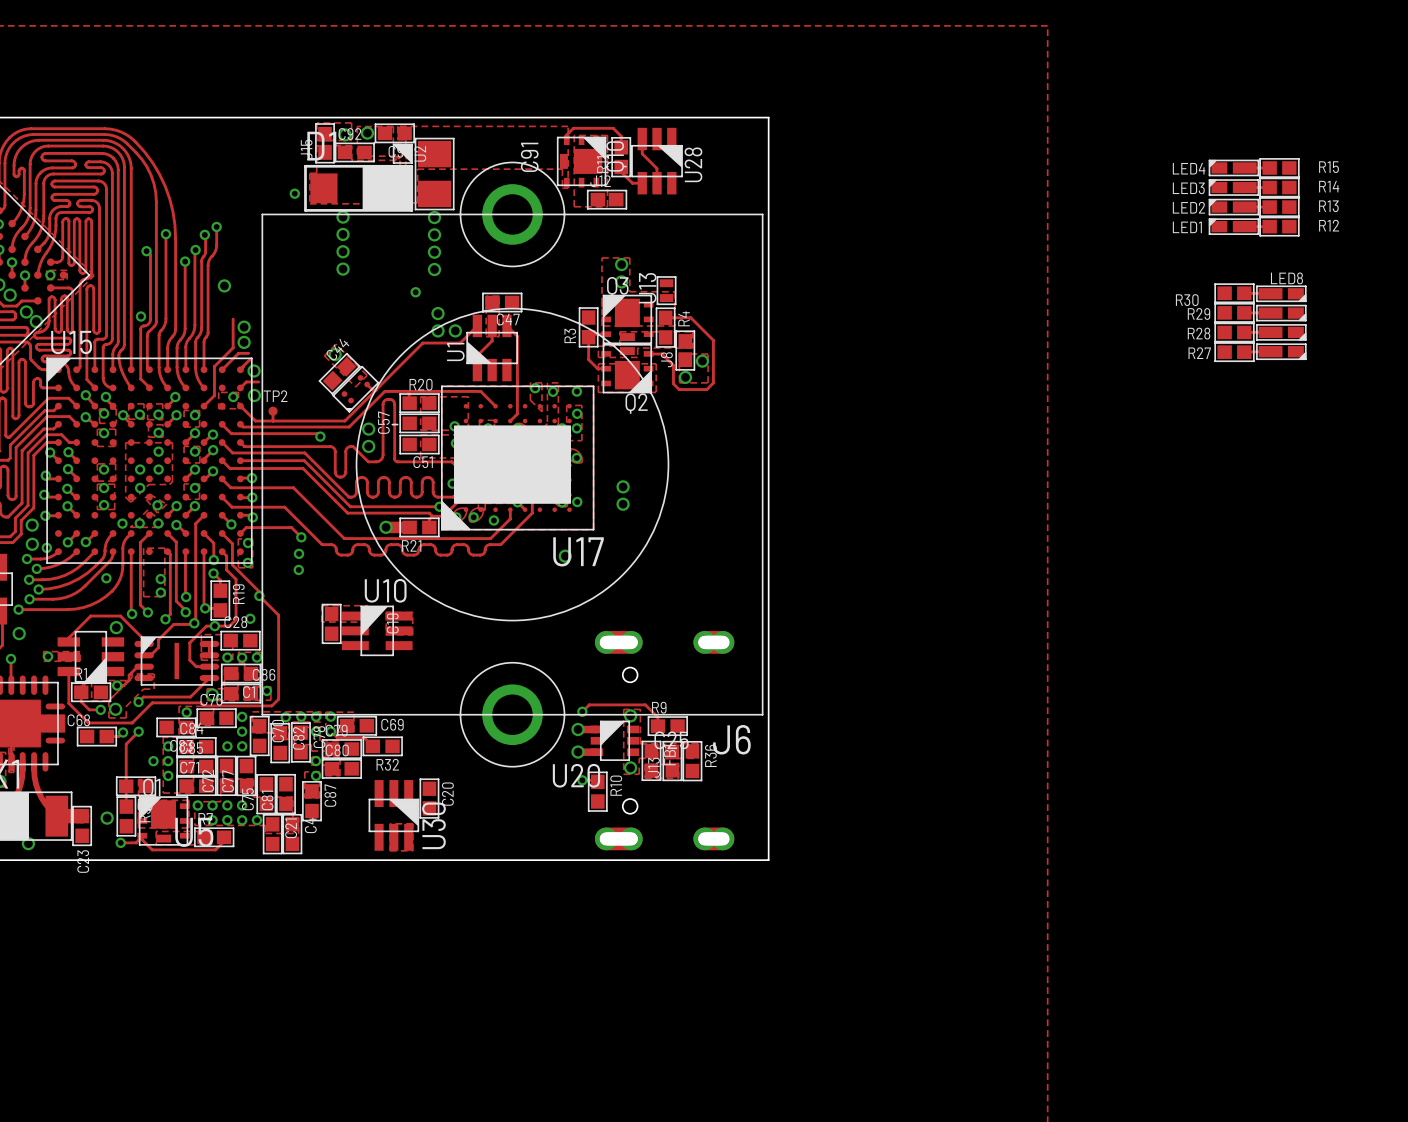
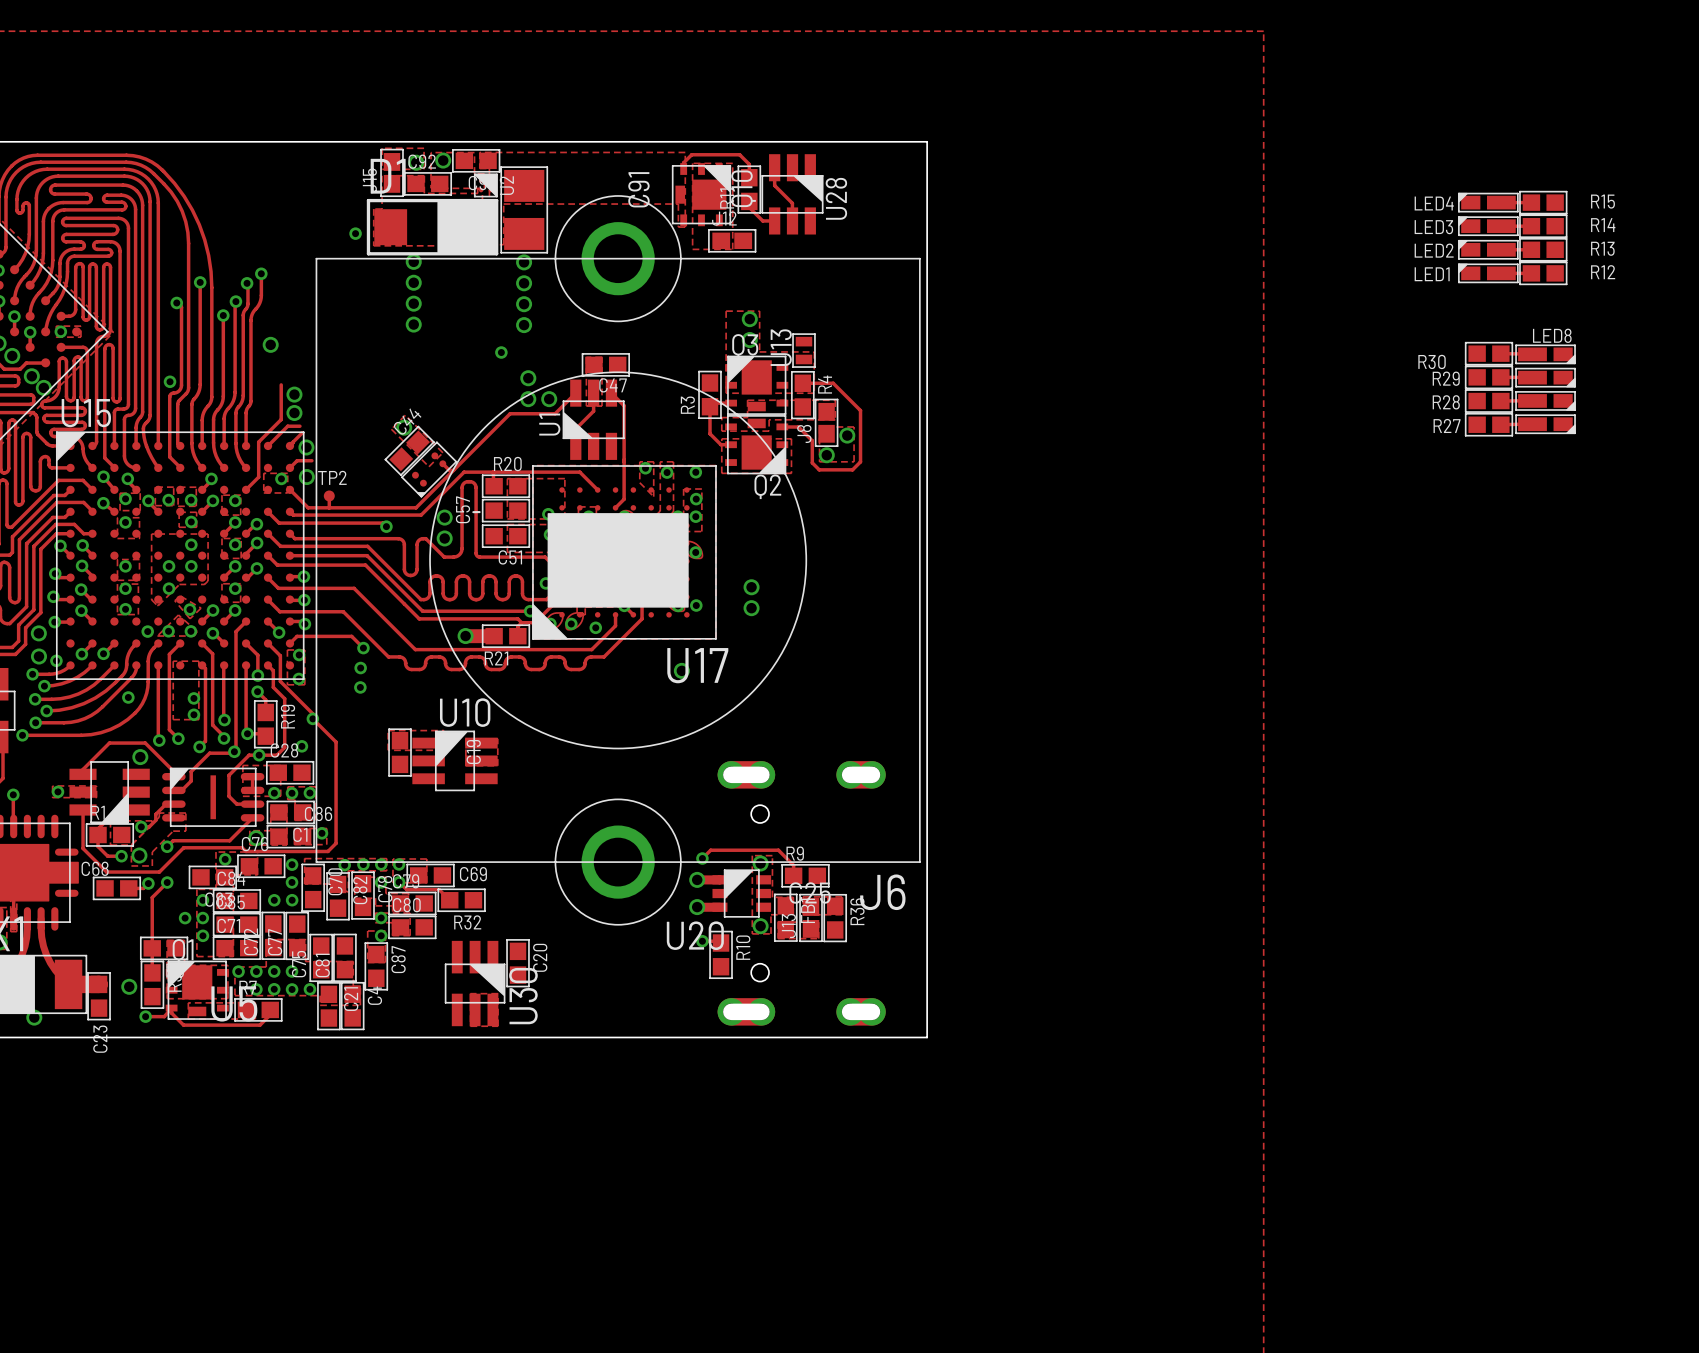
via: (19, 633) -> none

